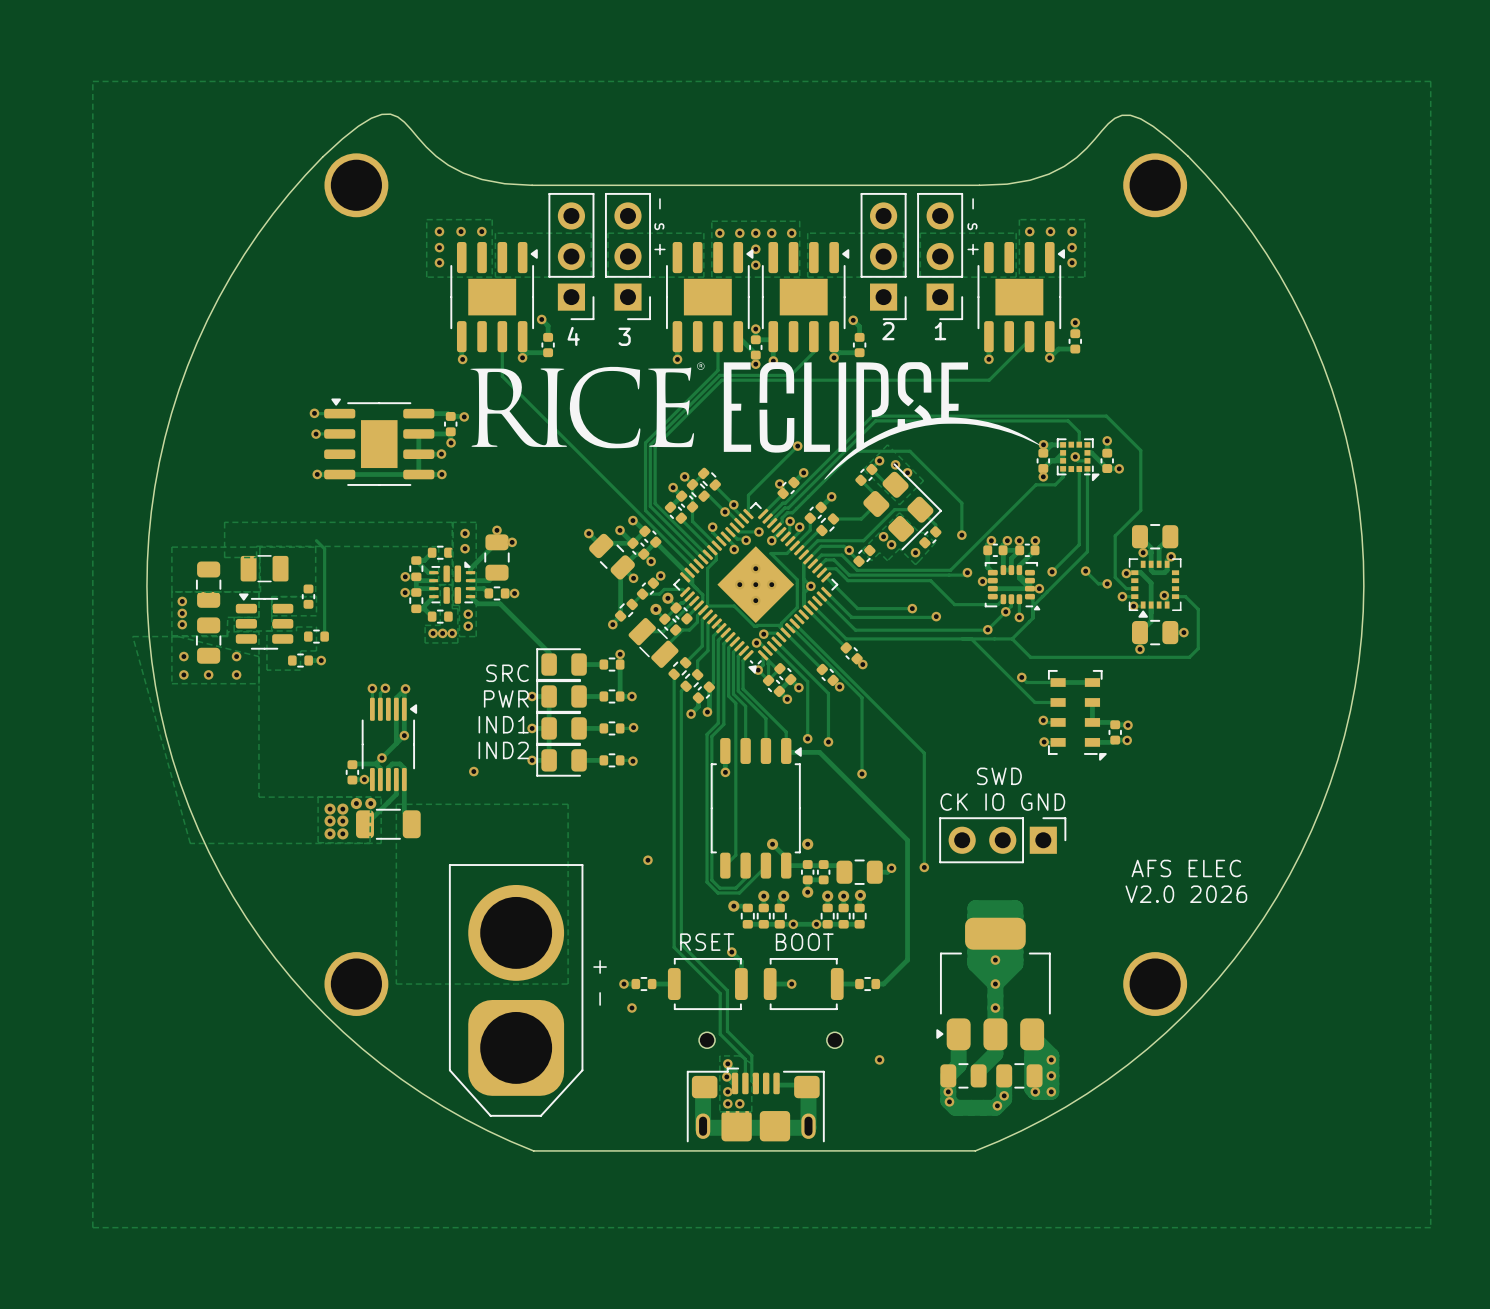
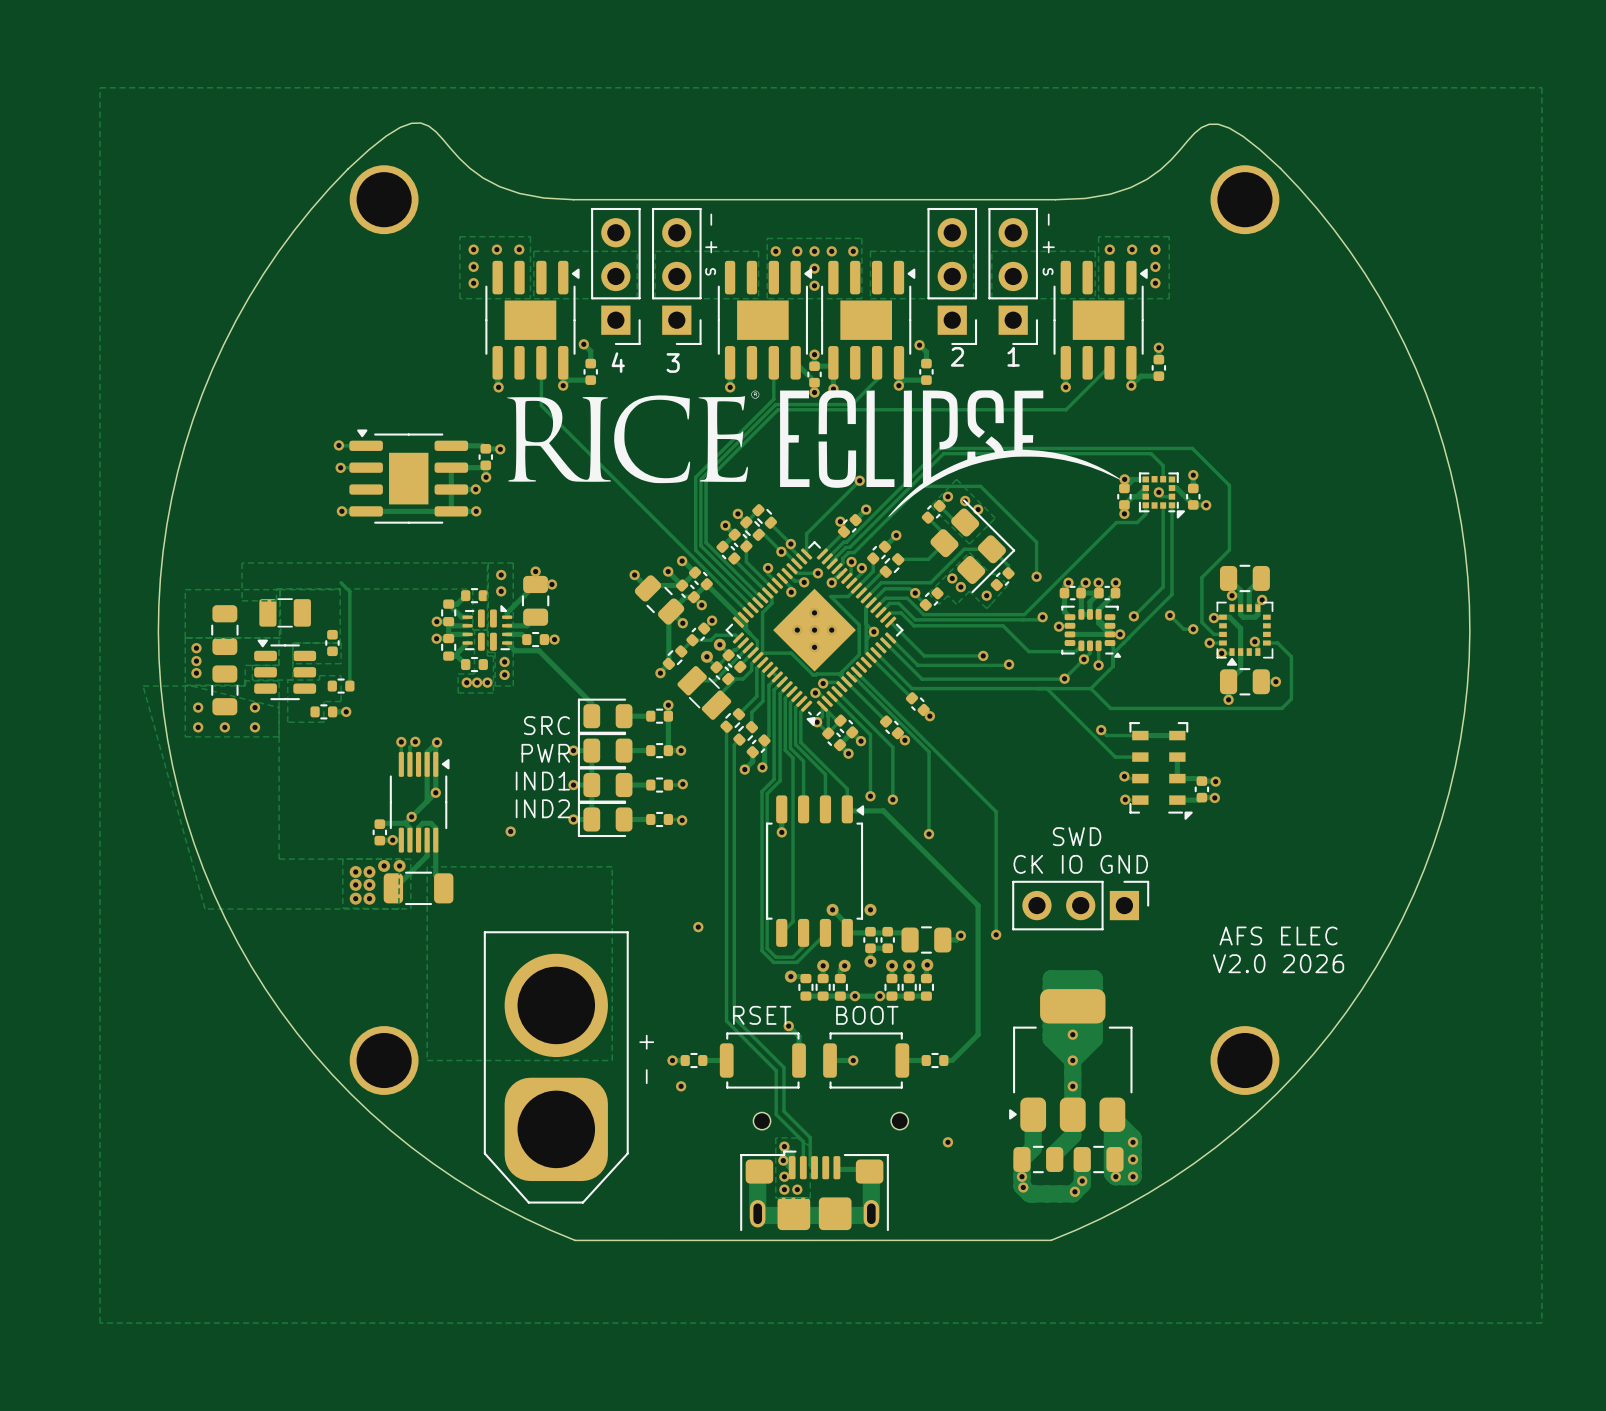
text: - s + (659, 226) -> - + s (711, 244)
text: - s + (973, 226) -> - + s (1048, 244)

